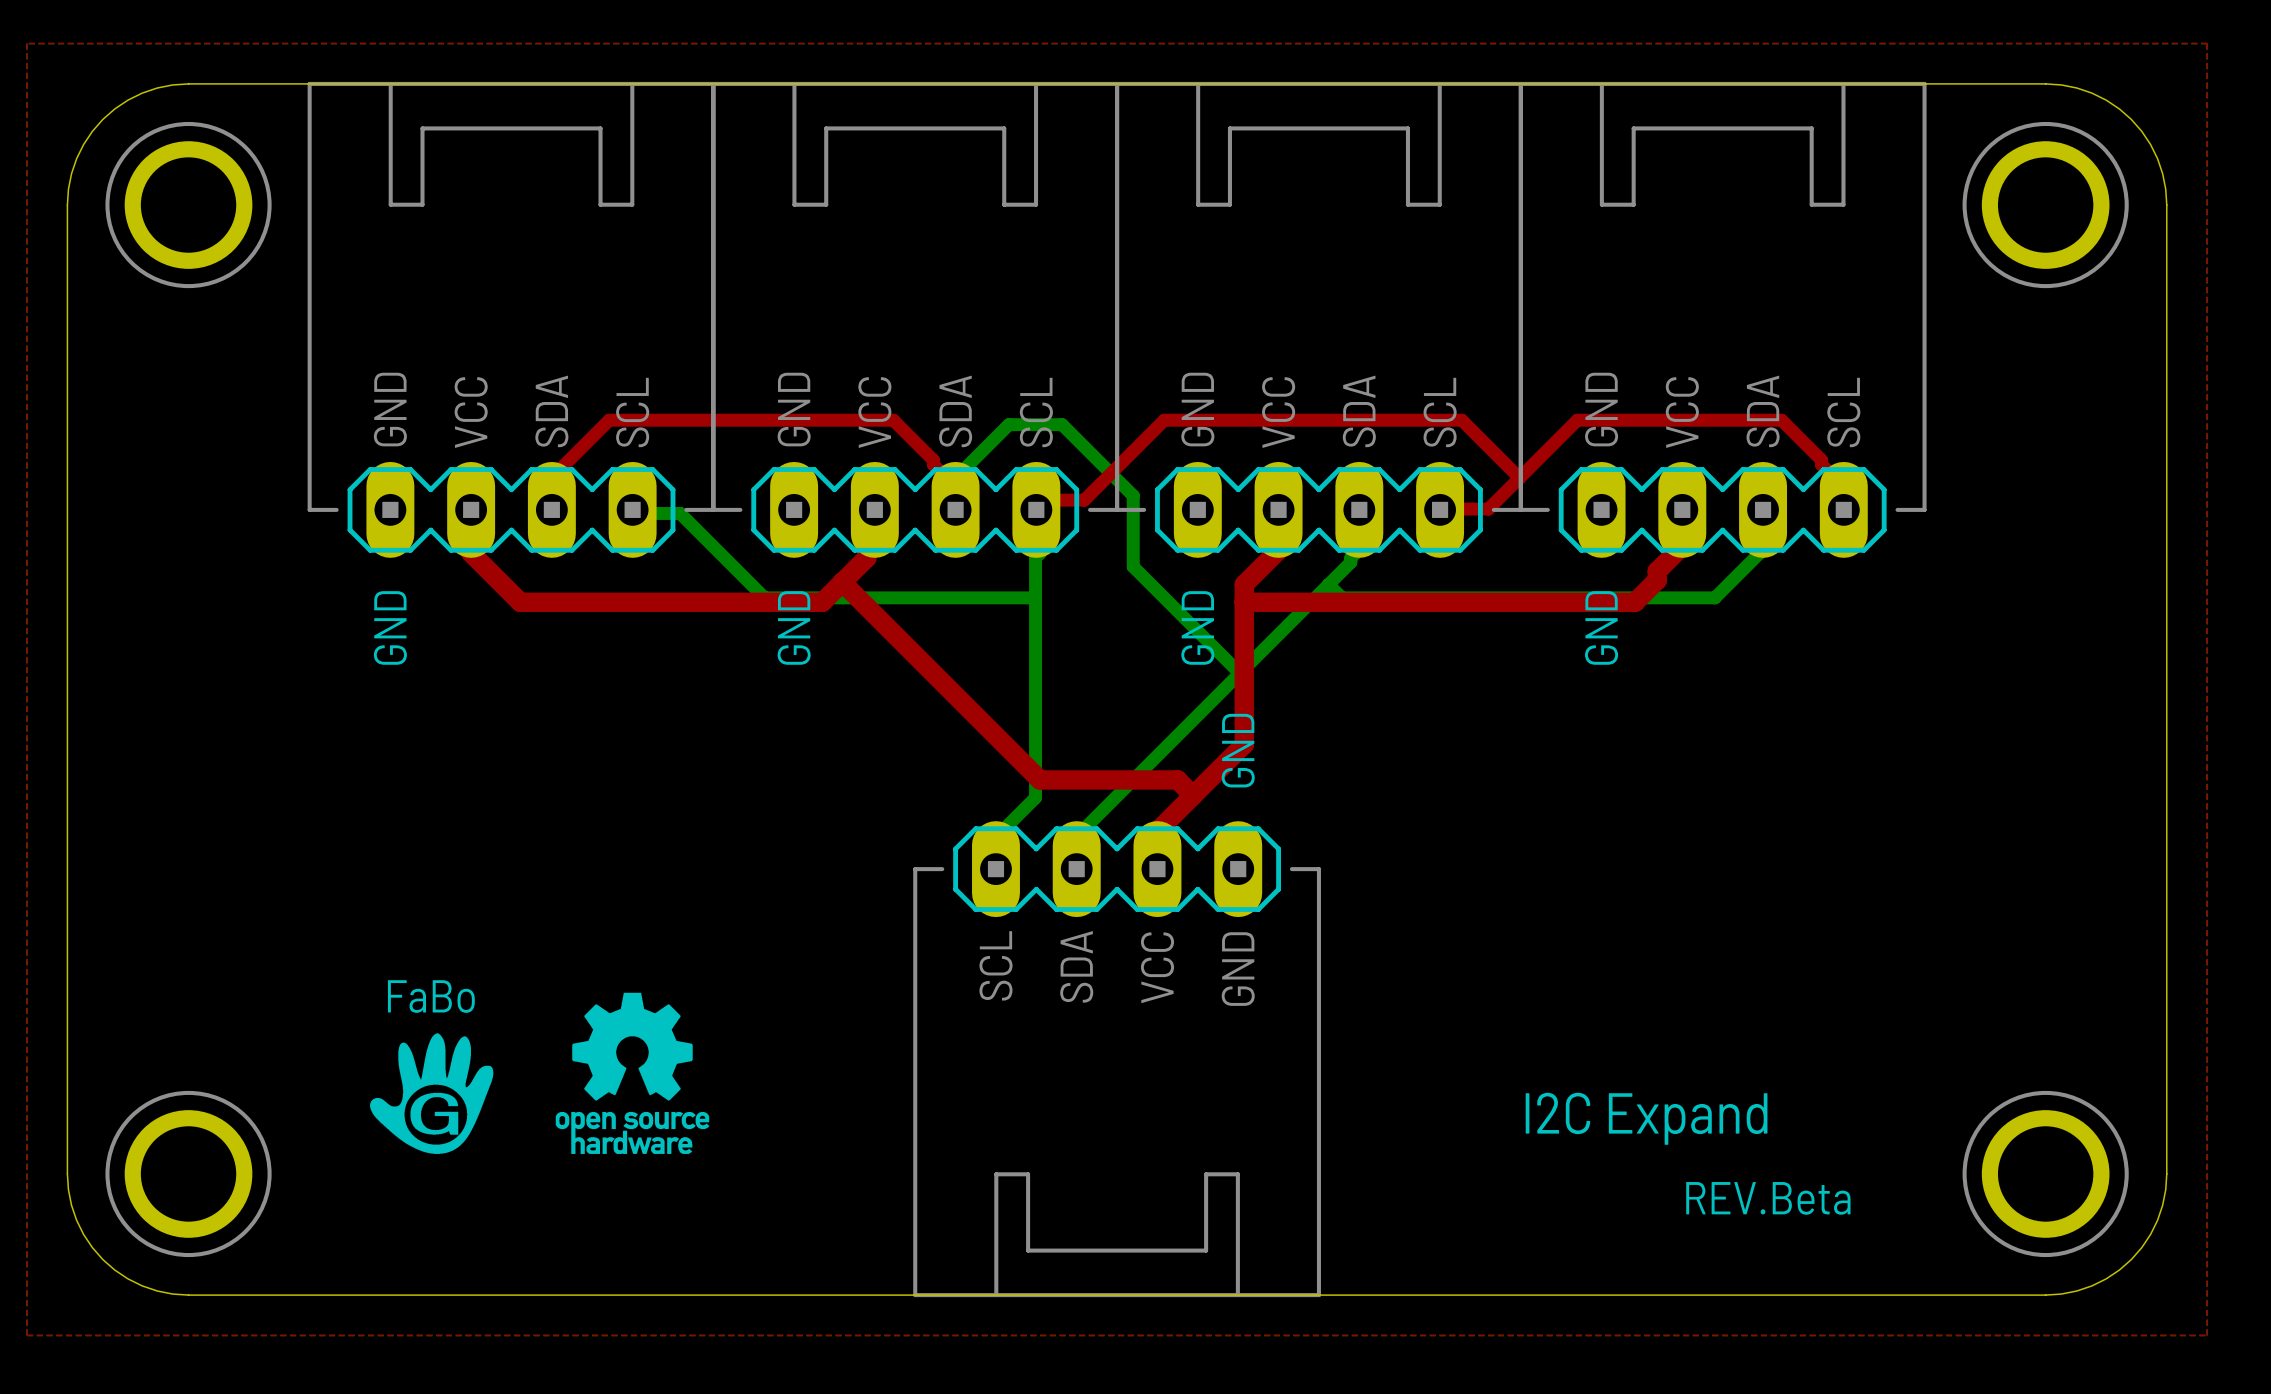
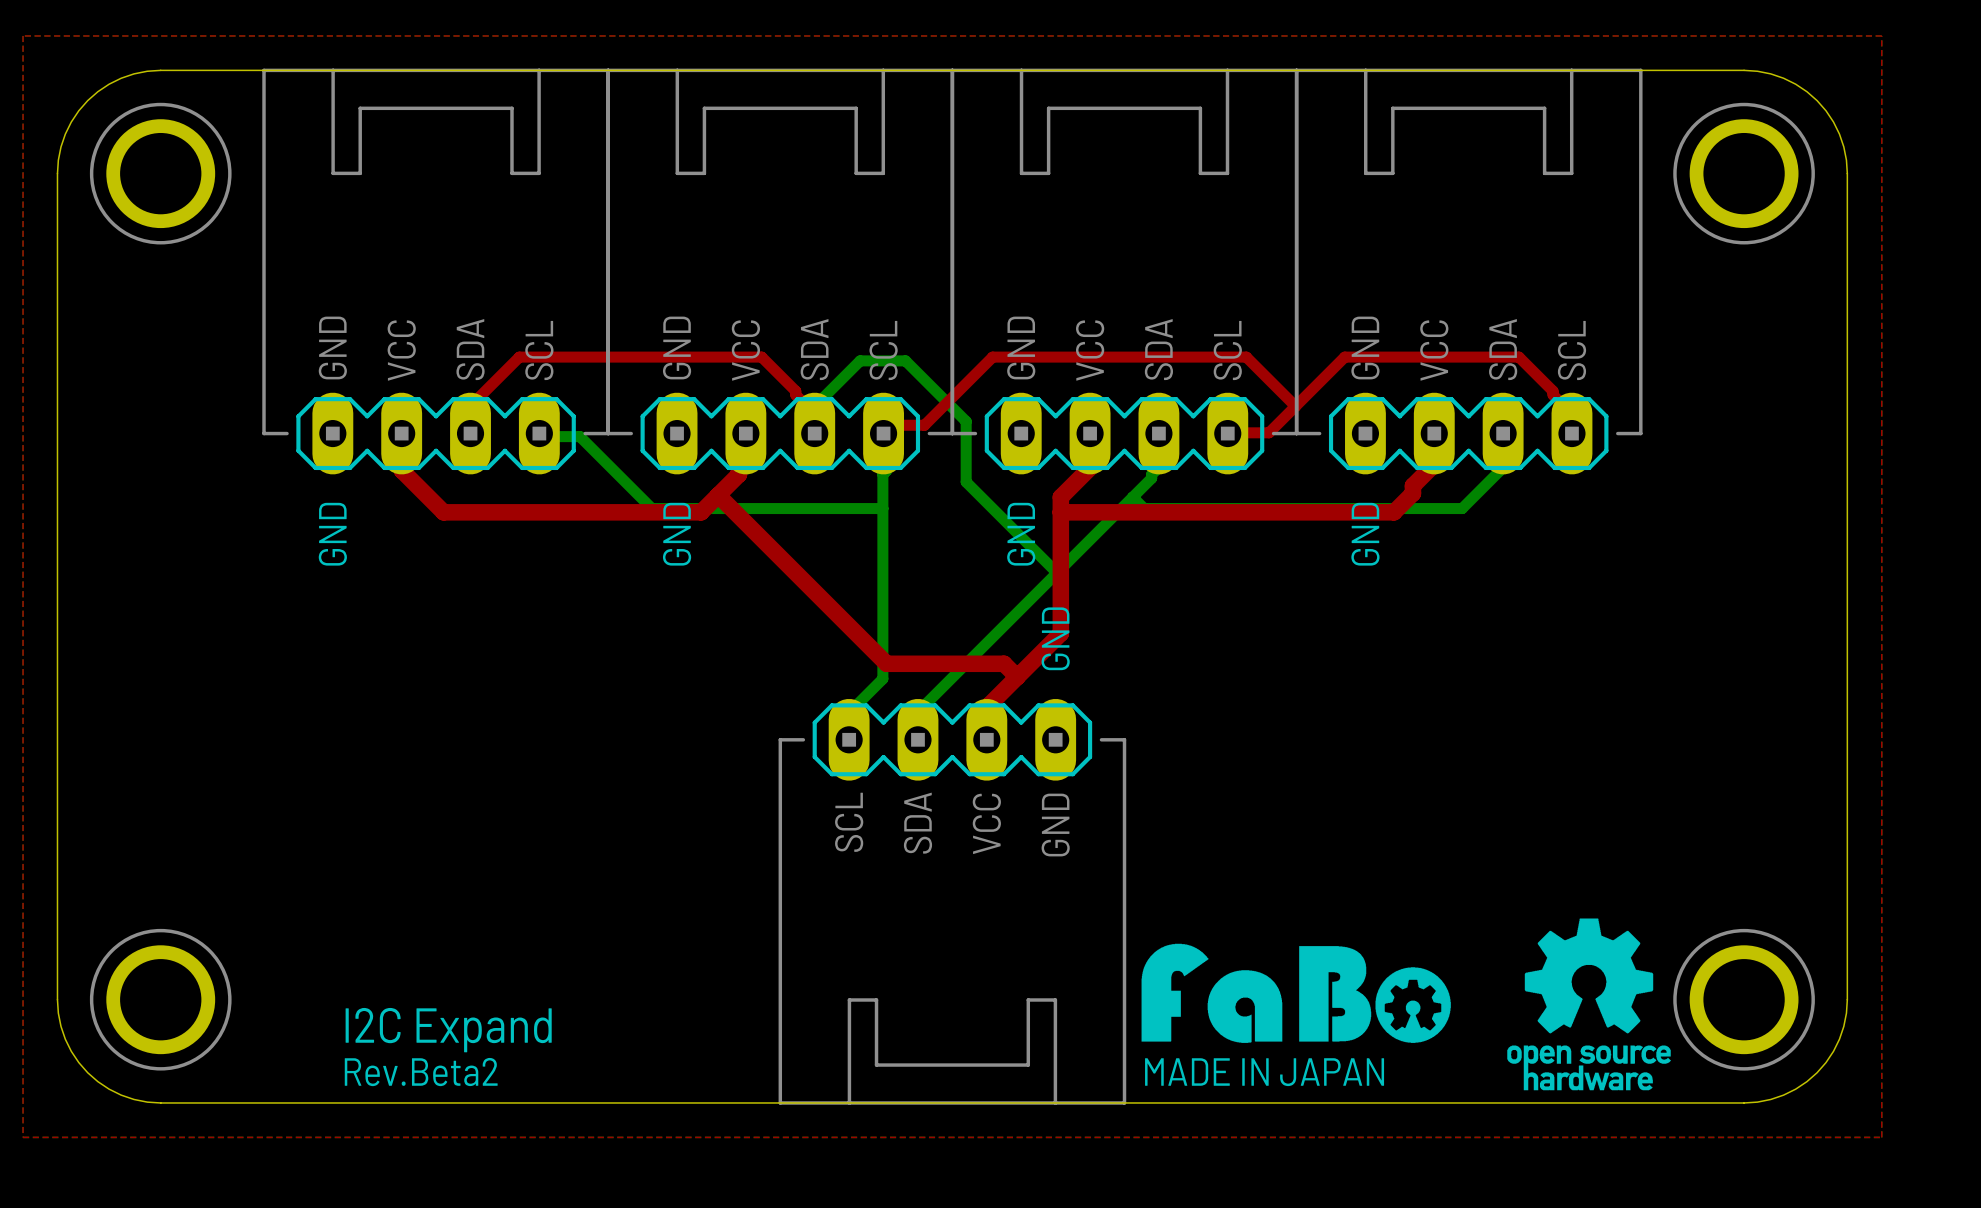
drawing: [555, 992, 710, 1154] -> none
text: FaBo (431, 996) -> none
drawing: [370, 1033, 494, 1154] -> none
drawing: none -> [1507, 918, 1671, 1091]
drawing: none -> [1141, 943, 1451, 1043]
text: I2C Expand (1646, 1118) -> none
text: REV.Beta (1768, 1198) -> none
text: none -> I2C Expand (448, 1030)
text: none -> Rev.Beta2 (421, 1072)
text: none -> MADE IN JAPAN (1264, 1072)

